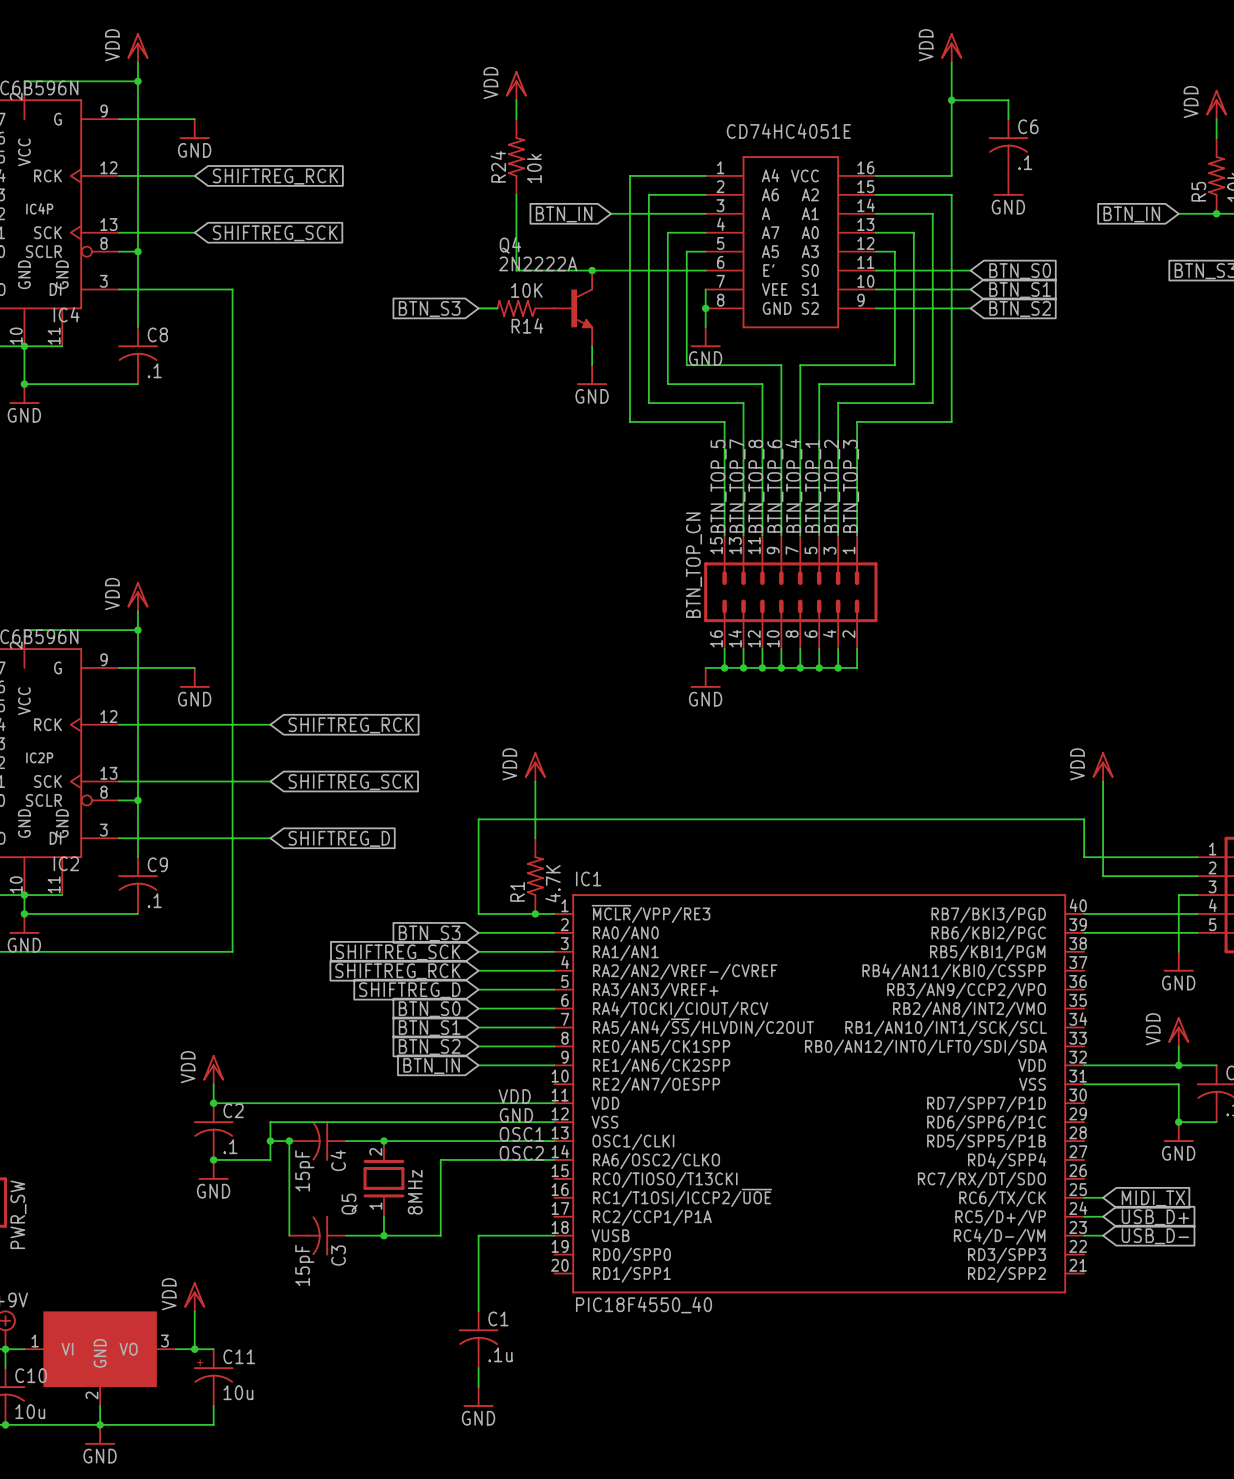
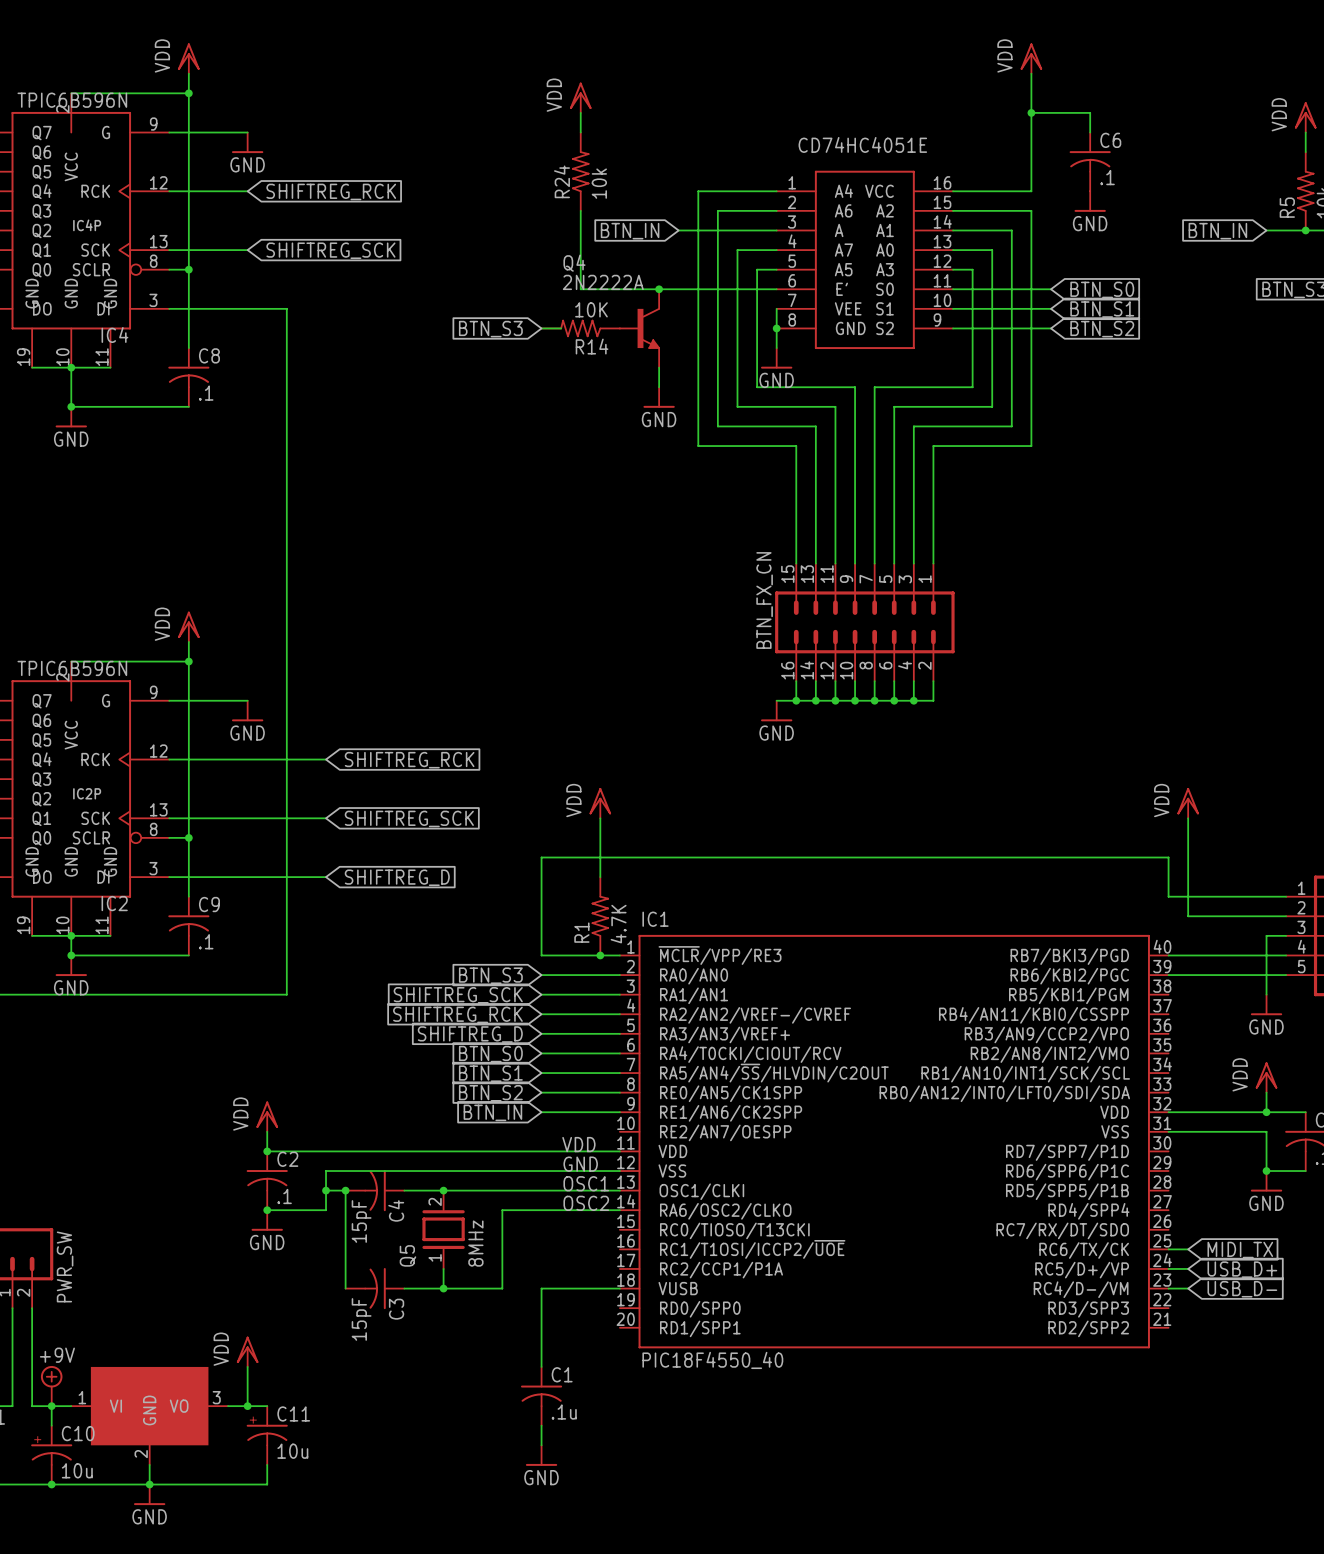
label: BTN_TOP_7 (737, 485) -> none
label: BTN_TOP_4 (793, 485) -> none
label: BTN_TOP_5 (718, 486) -> none
label: BTN_TOP_8 (756, 486) -> none
label: BTN_TOP_6 (775, 486) -> none
label: BTN_TOP_1 (813, 486) -> none
label: BTN_TOP_2 (832, 486) -> none
label: BTN_TOP_3 (851, 486) -> none
BTN_TOP_CN name: BTN_TOP_CN (694, 565) -> BTN_FX_CN (764, 600)

